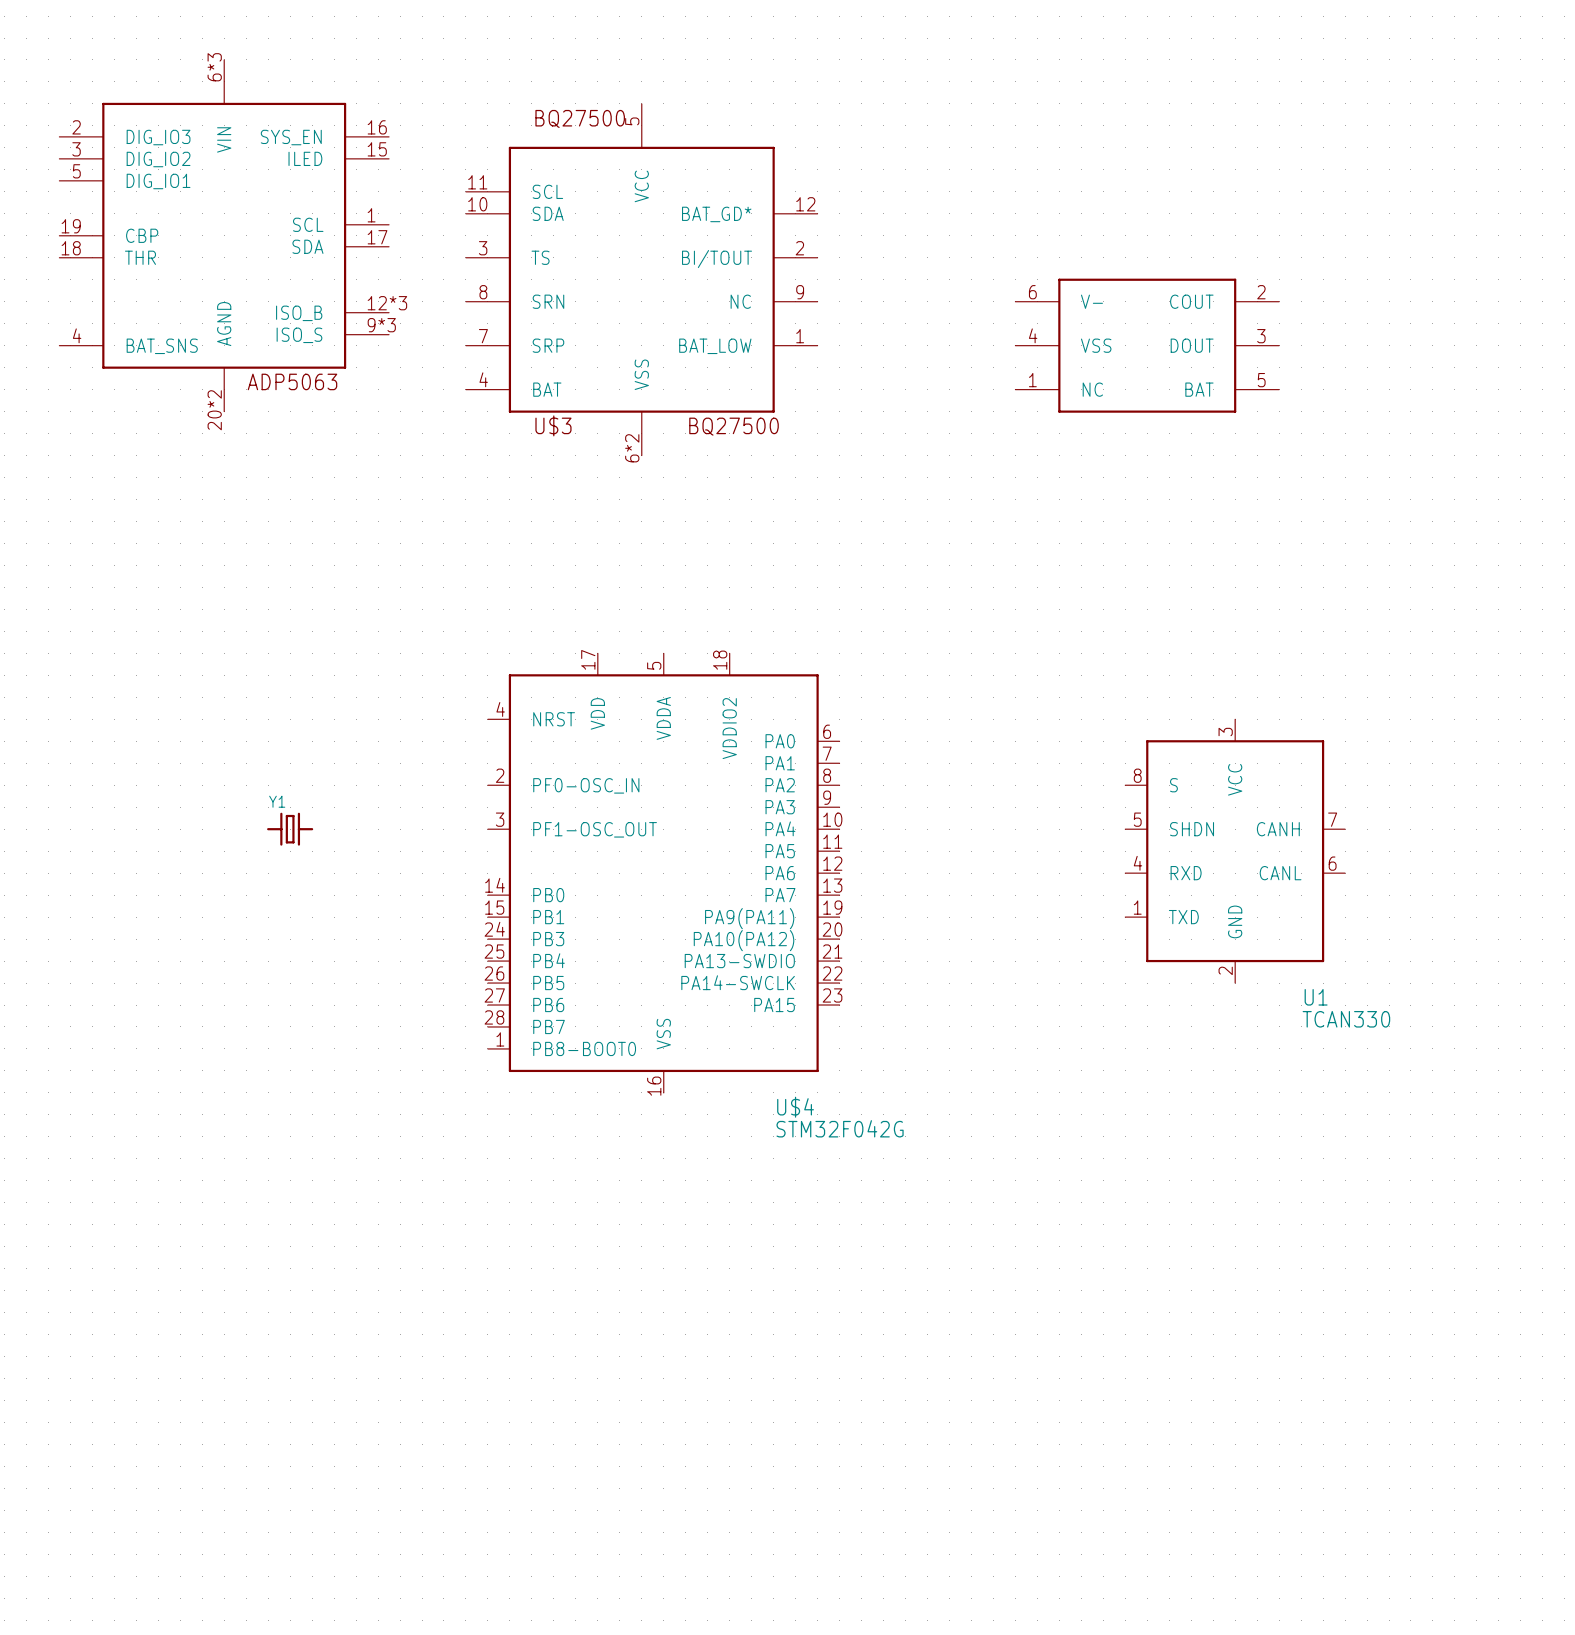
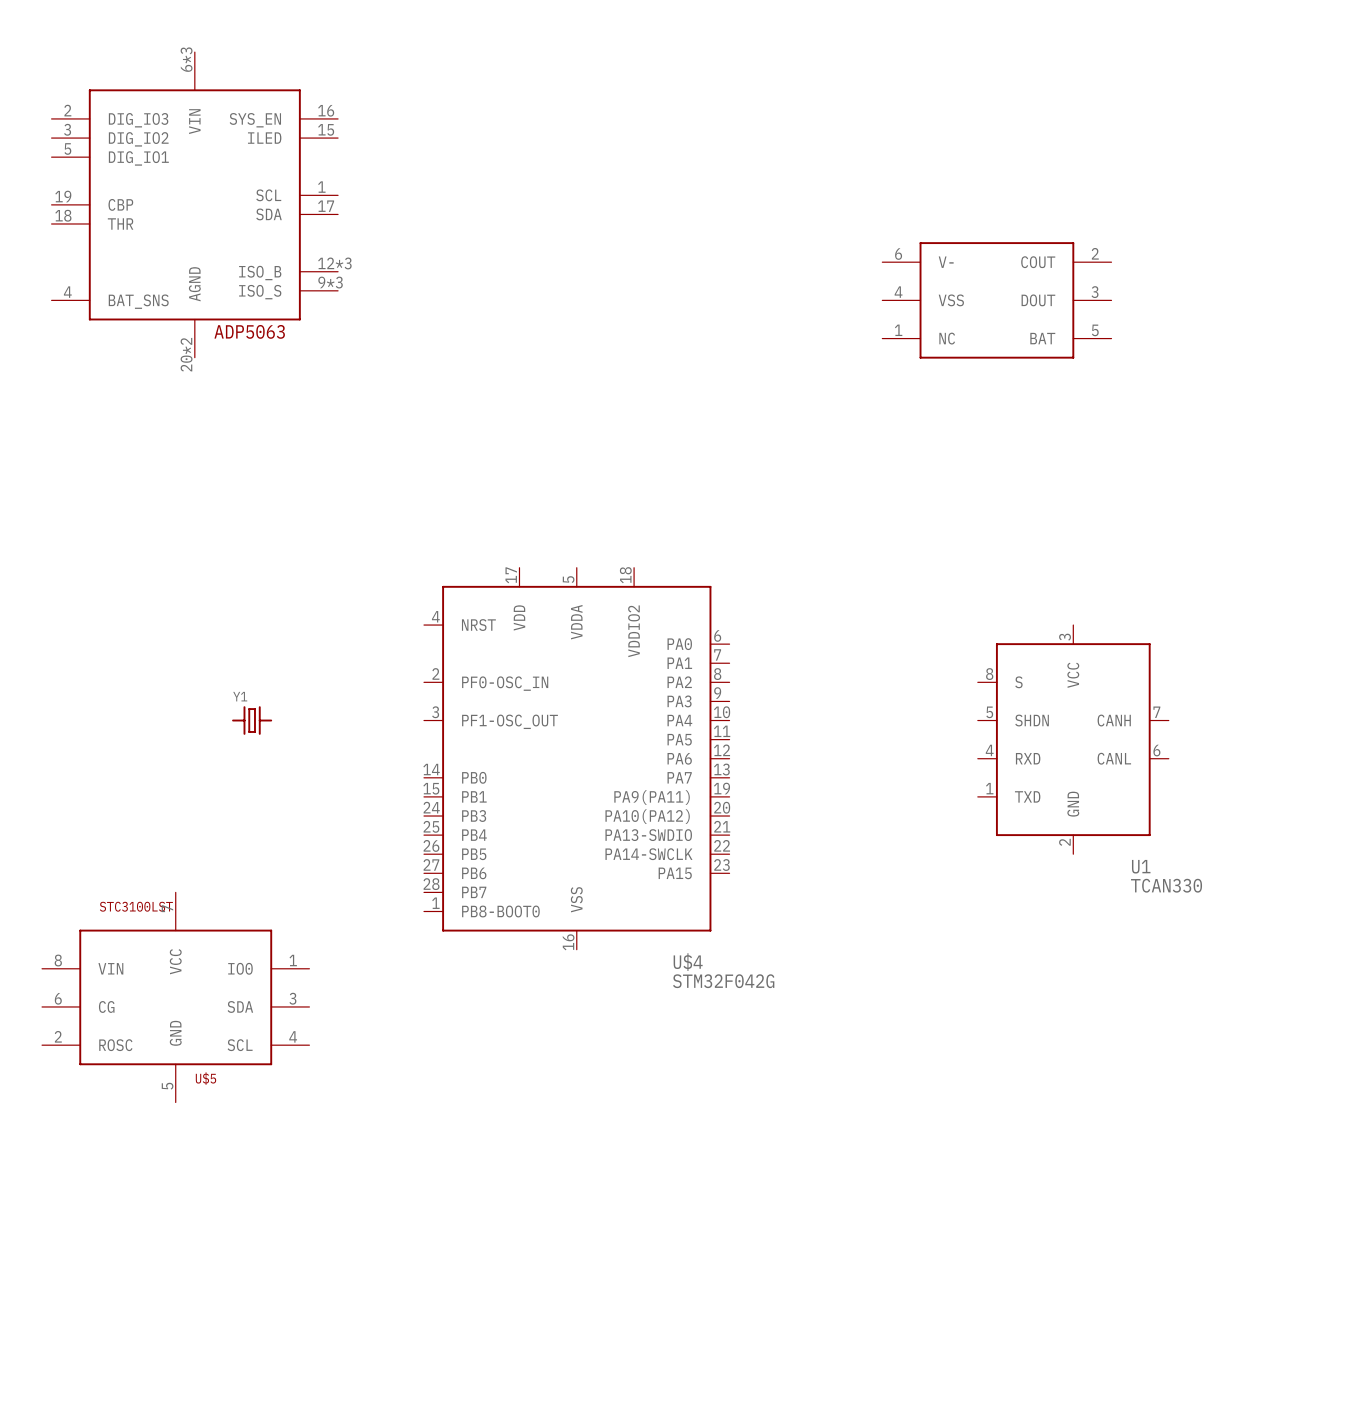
U$3: BQ27500 (641, 279) -> none
U$5: none -> STC3100LST (175, 997)

